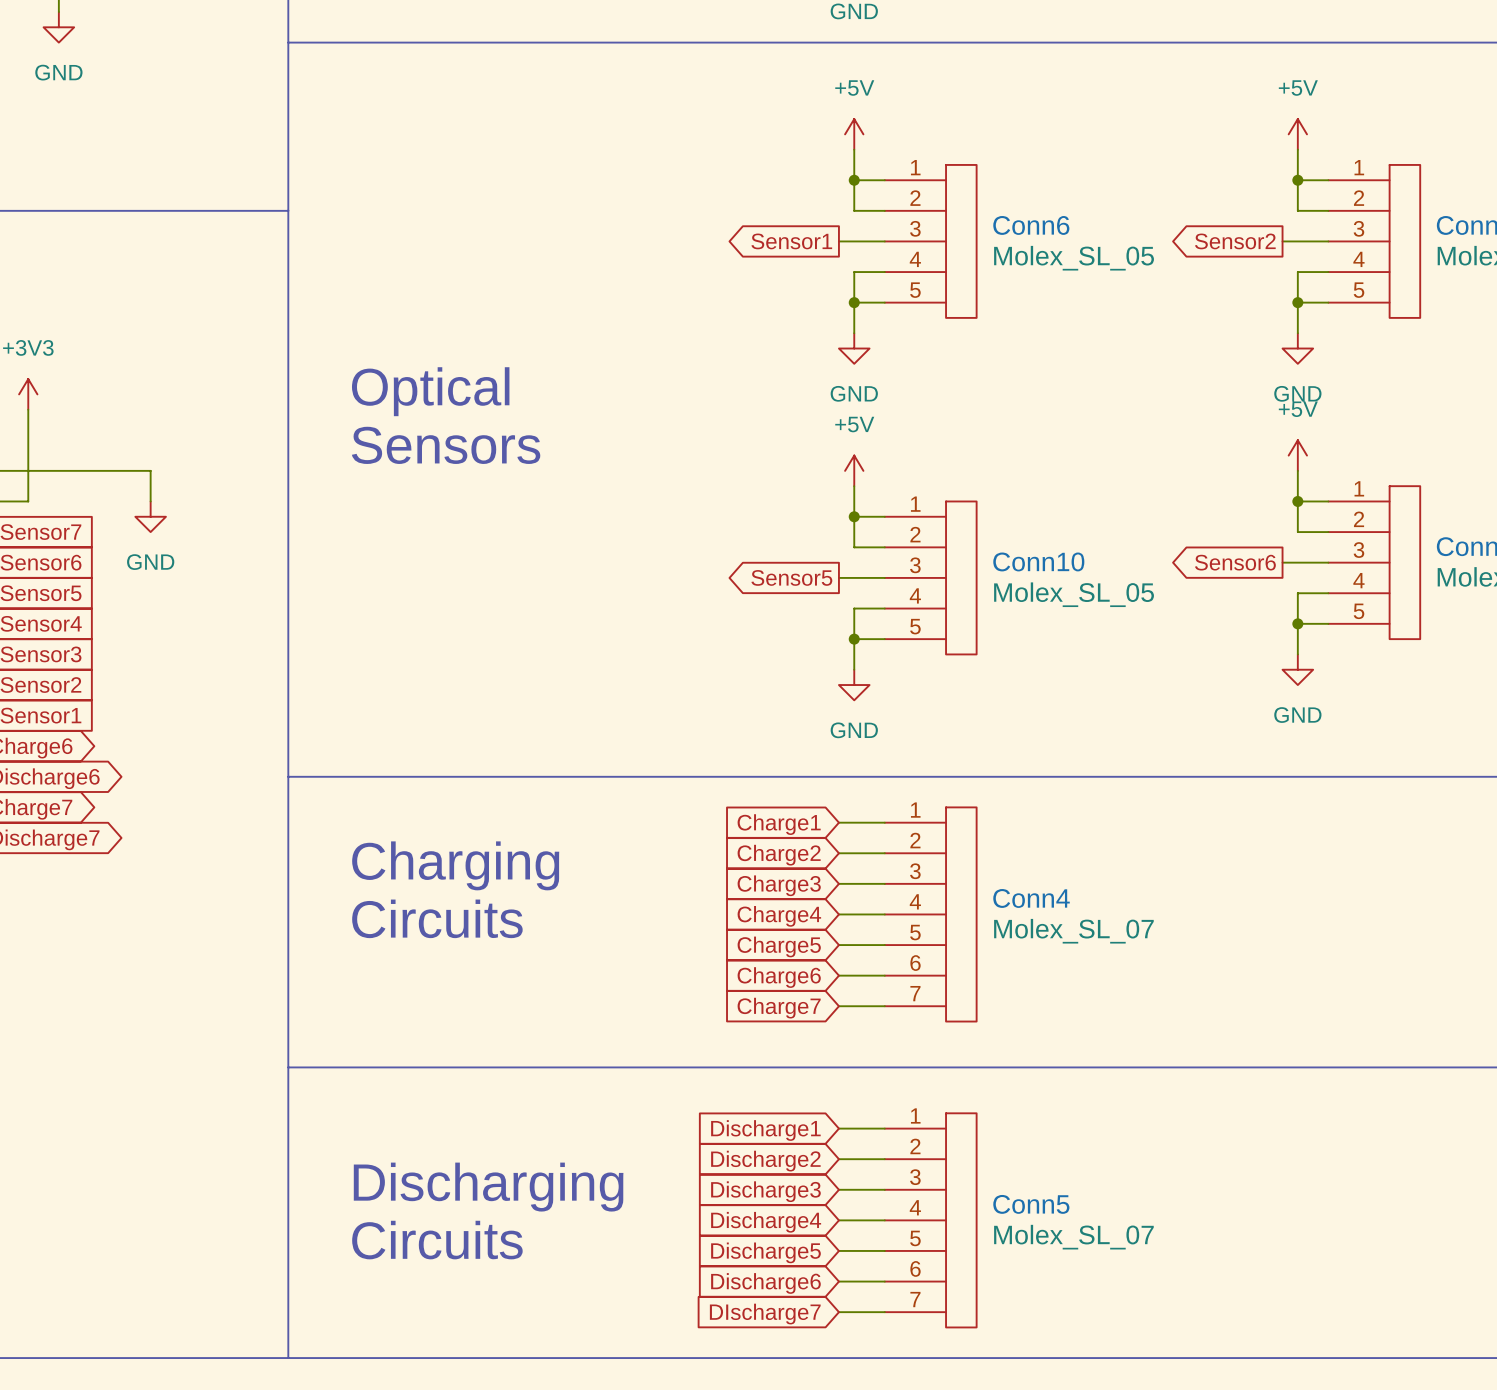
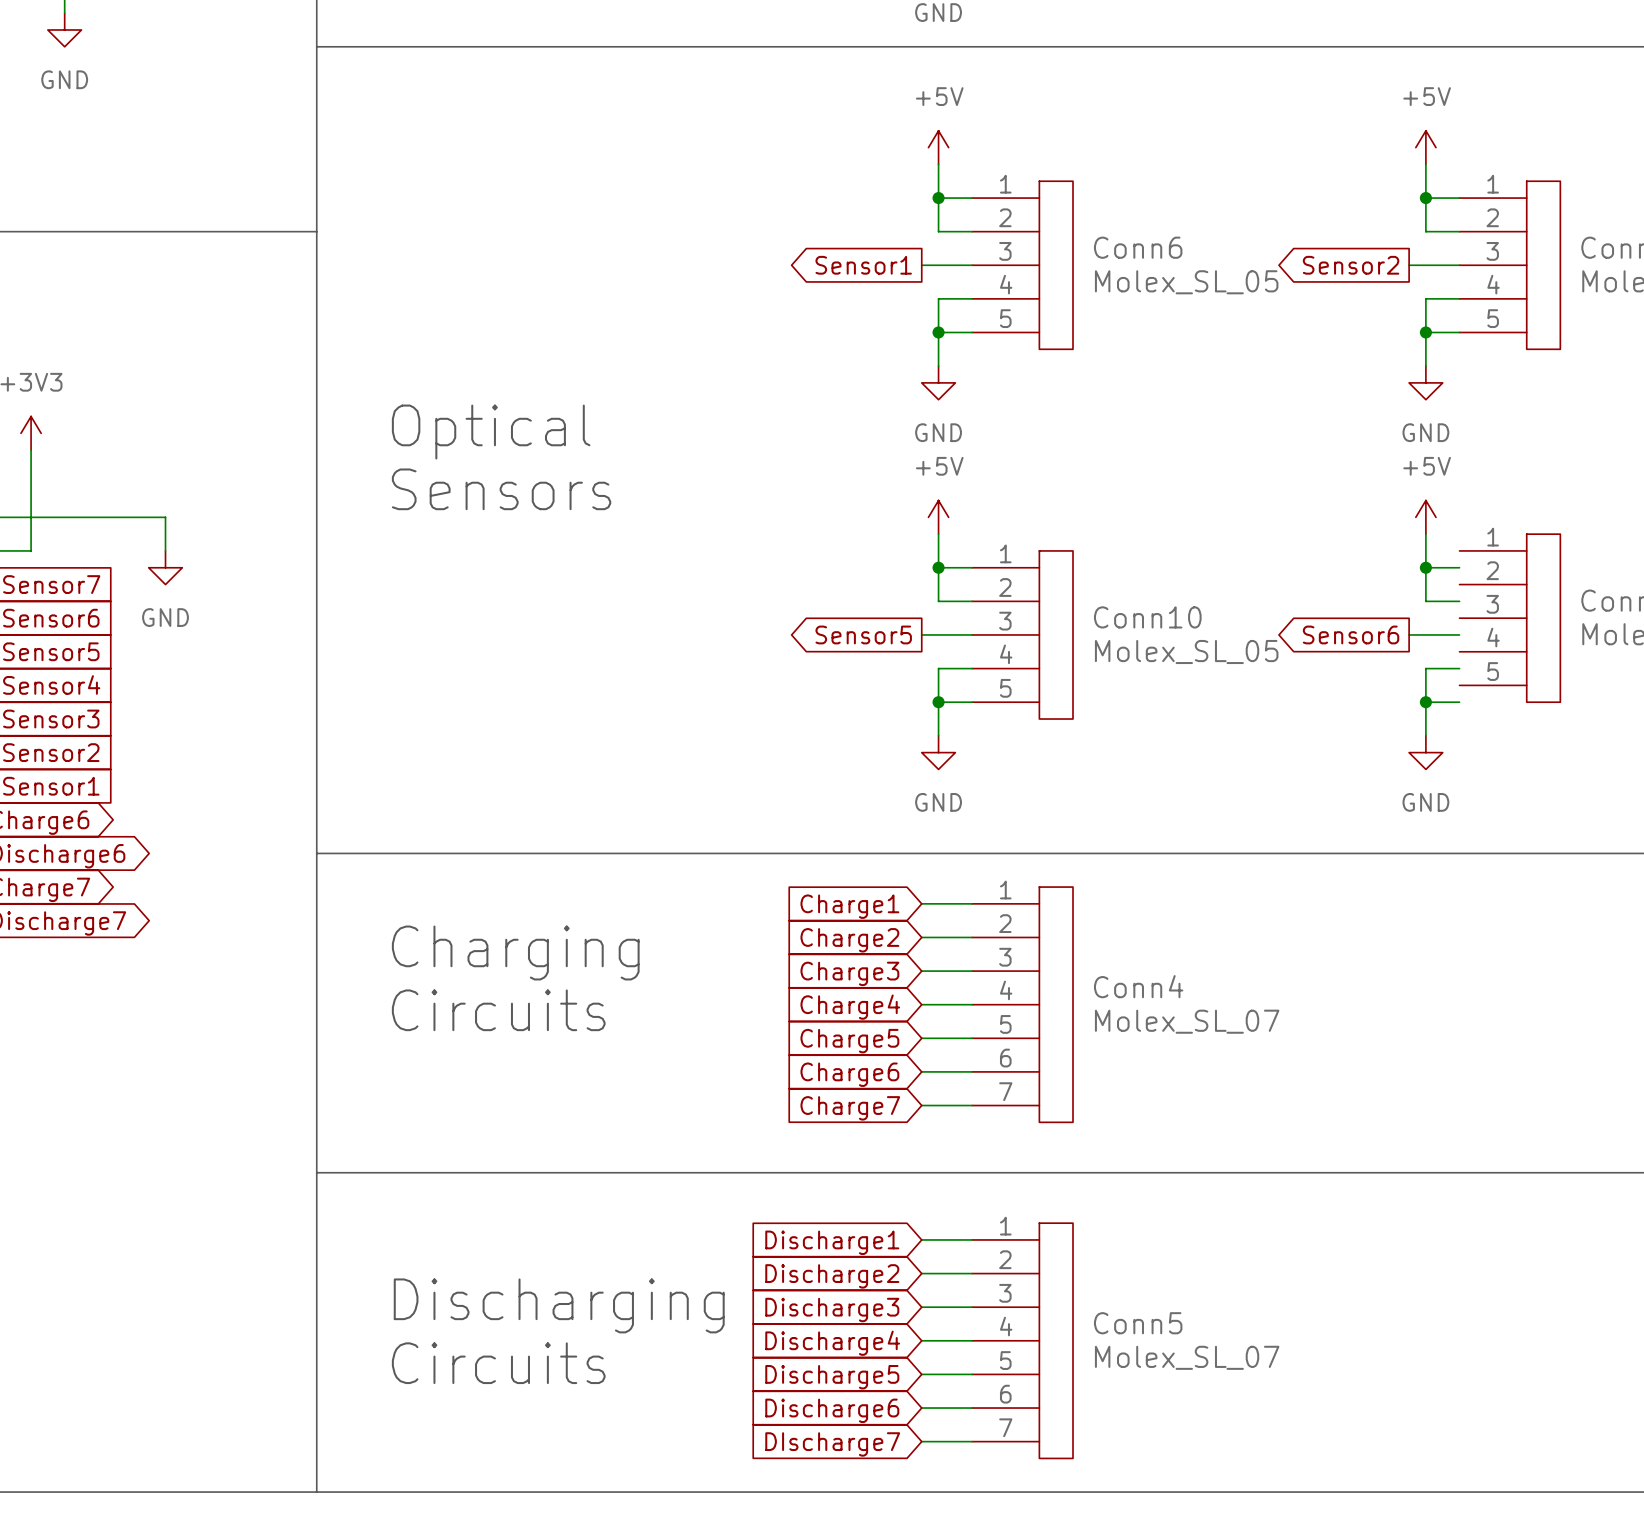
power symbol position: +5V (1297, 455) -> +5V (1425, 517)
wire: (1297, 501) (1328, 501) -> (1425, 567) (1459, 567)
junction position: (1297, 501) -> (1425, 567)
wire: (1297, 532) (1328, 532) -> (1425, 584) (1425, 601) (1459, 601)
global label position: Sensor6 (1235, 562) -> Sensor6 (1351, 634)
wire: (1282, 562) (1328, 562) -> (1409, 634) (1459, 634)
wire: (1328, 593) (1297, 593) (1297, 608) -> (1459, 668) (1425, 668)
wire: (1297, 623) (1328, 623) -> (1425, 702) (1459, 702)
junction position: (1297, 623) -> (1425, 702)
power symbol position: GND (1297, 669) -> GND (1425, 752)

